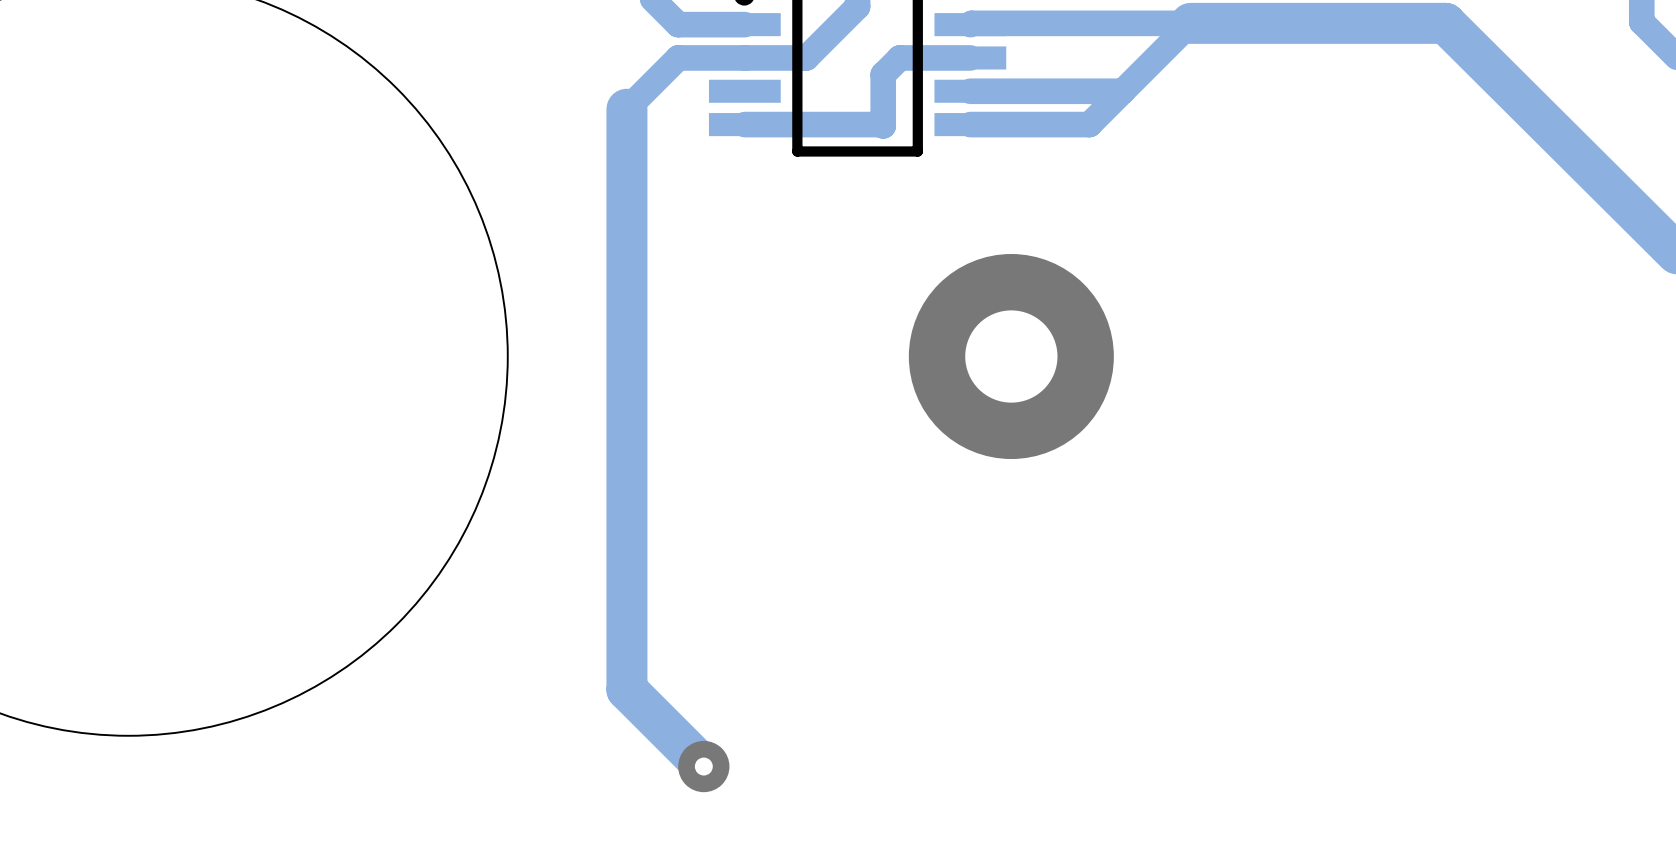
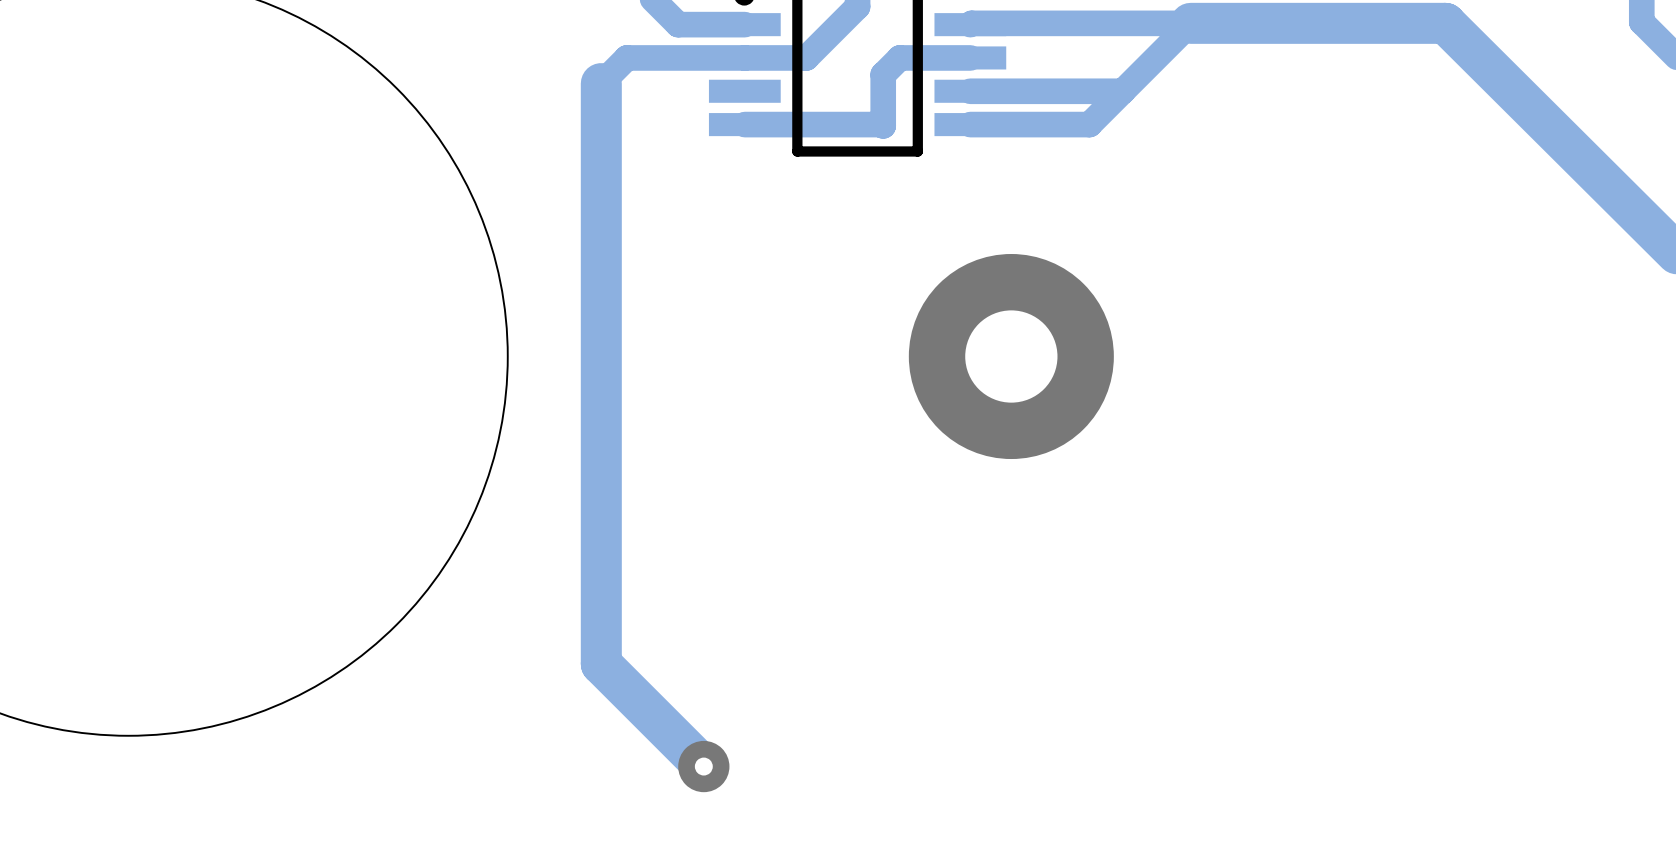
track: (678, 57) (626, 109) (626, 689) -> (678, 57) (626, 57) (601, 83) (601, 664) (626, 689)

